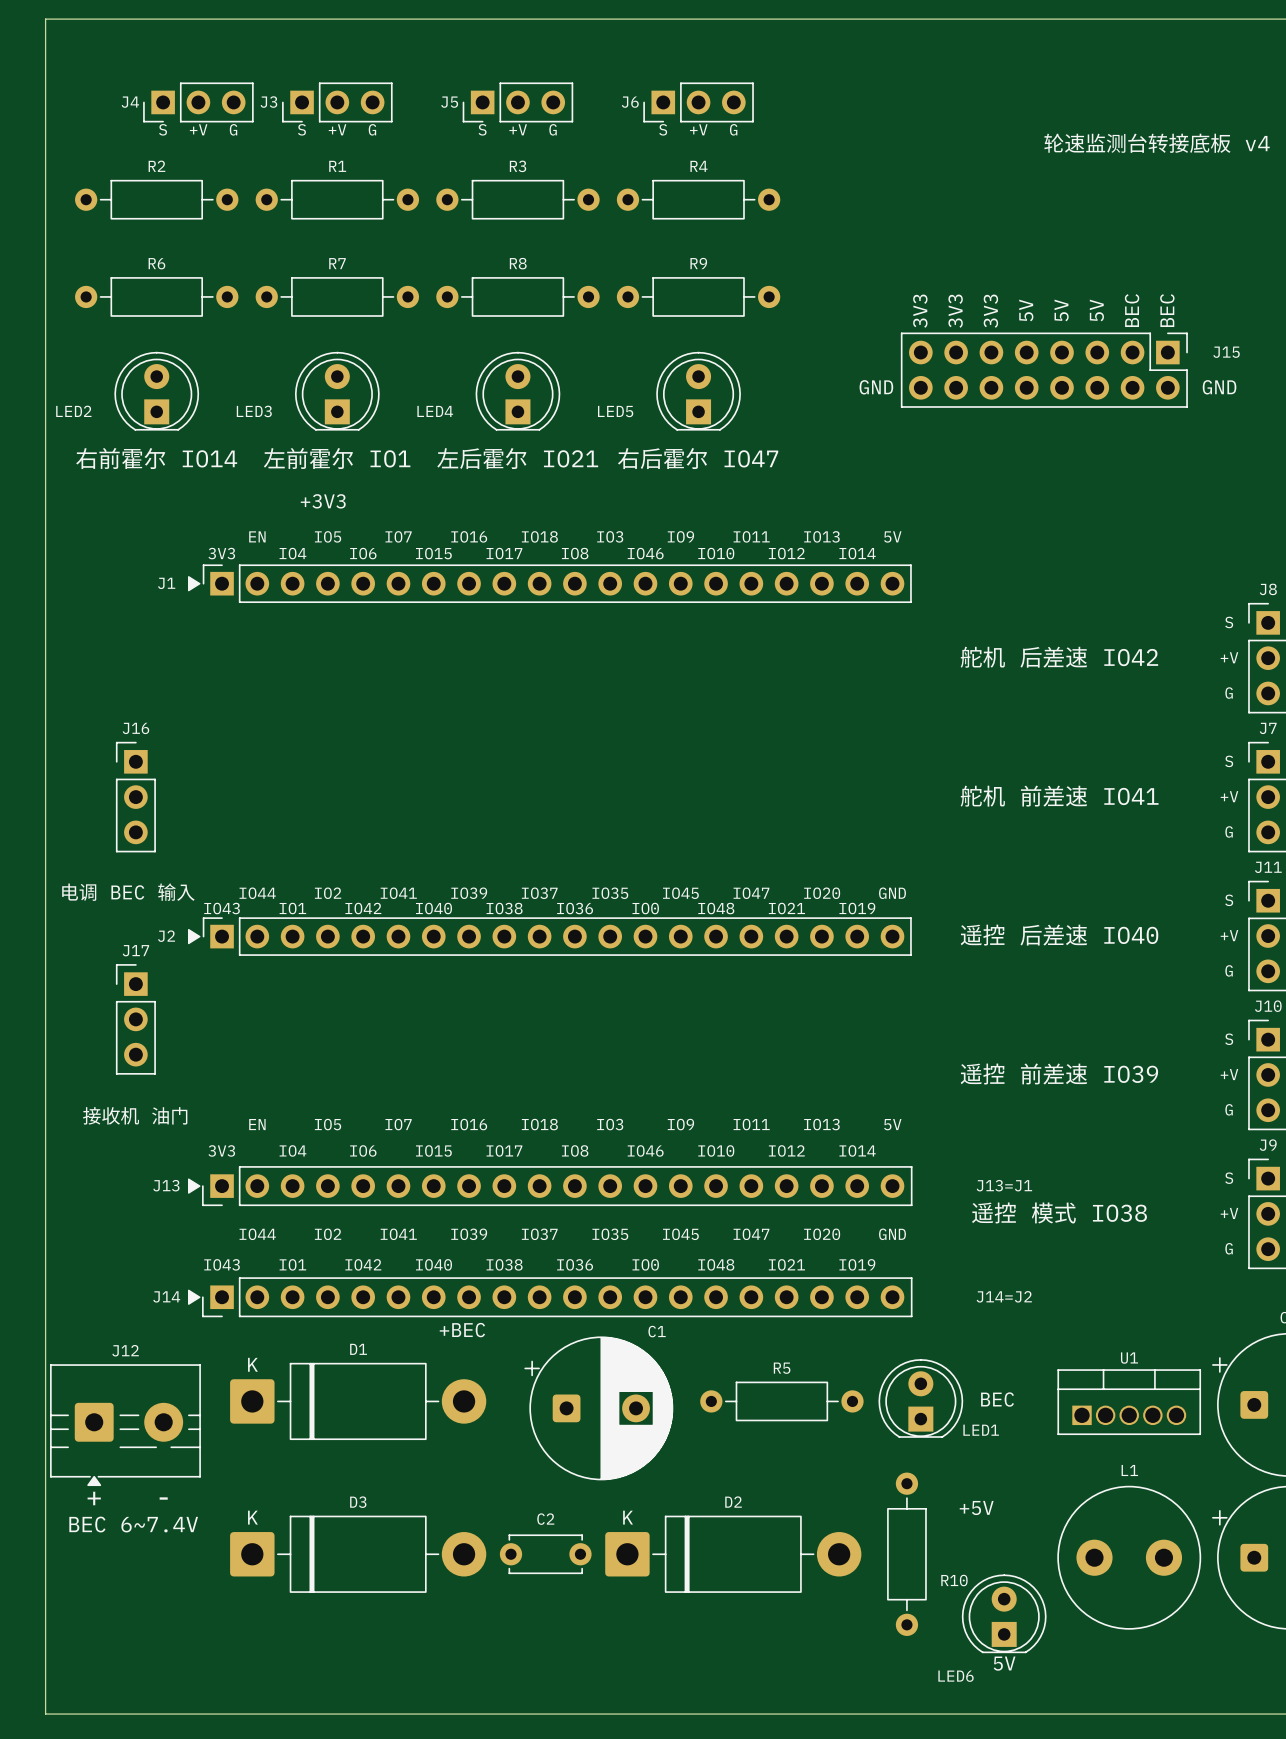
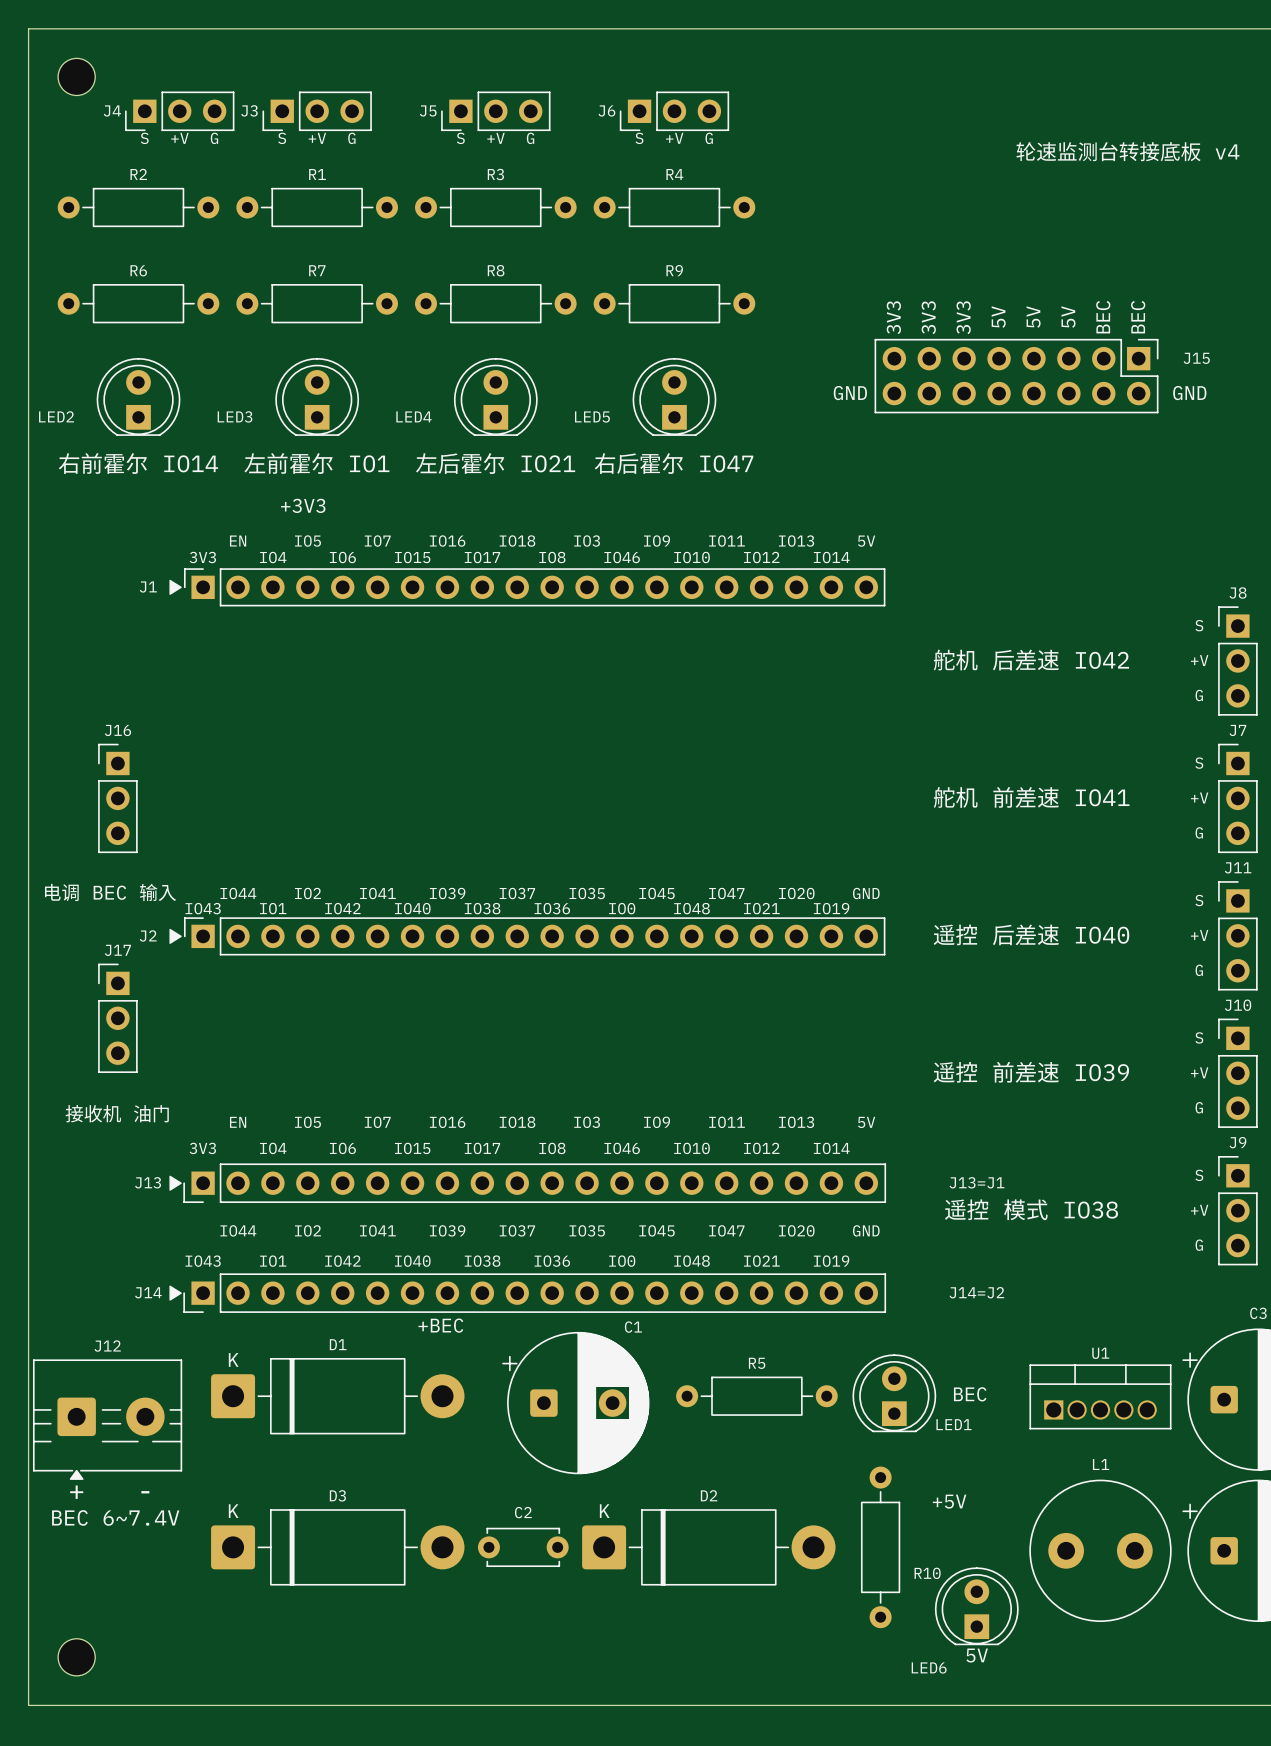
part: none -> (76, 76)
part: none -> (76, 1657)

